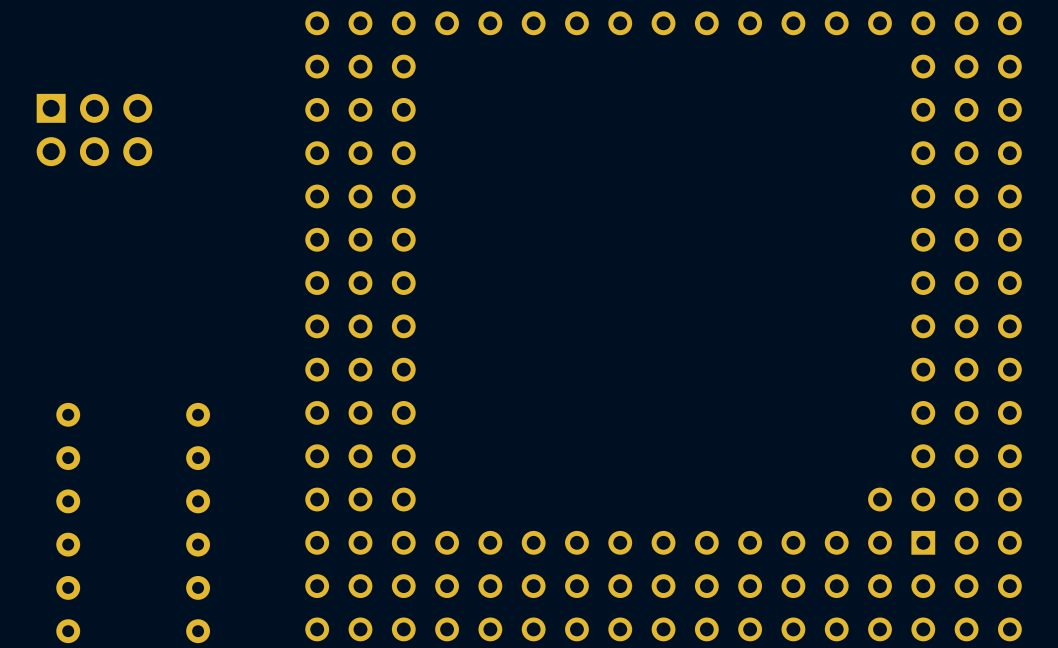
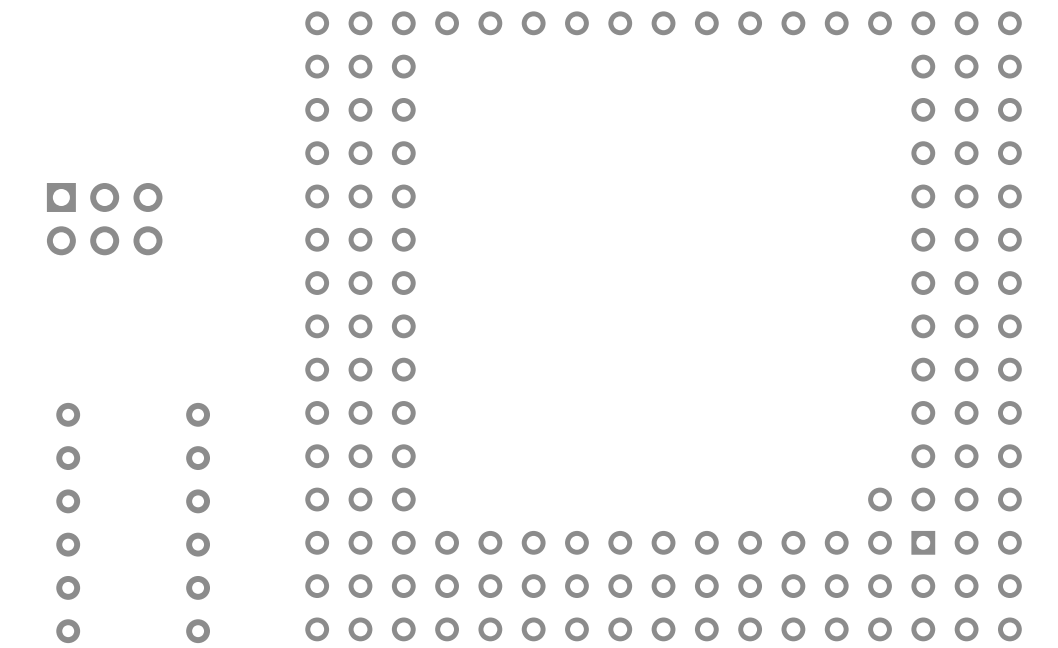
part position: (94, 129) -> (104, 219)

